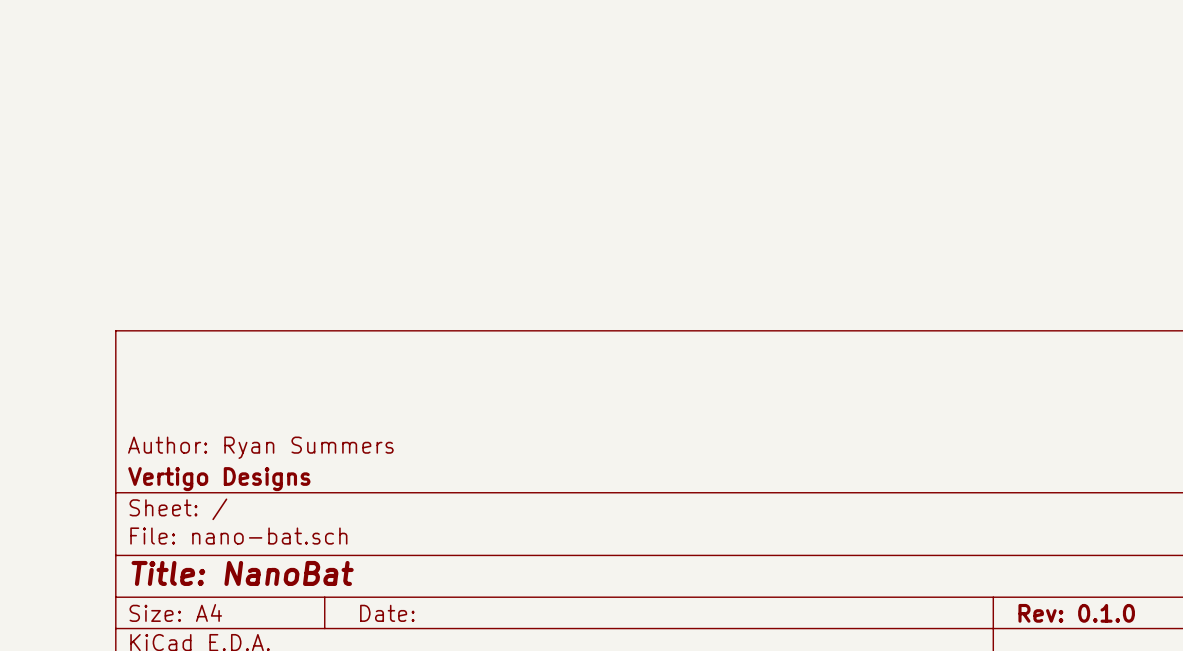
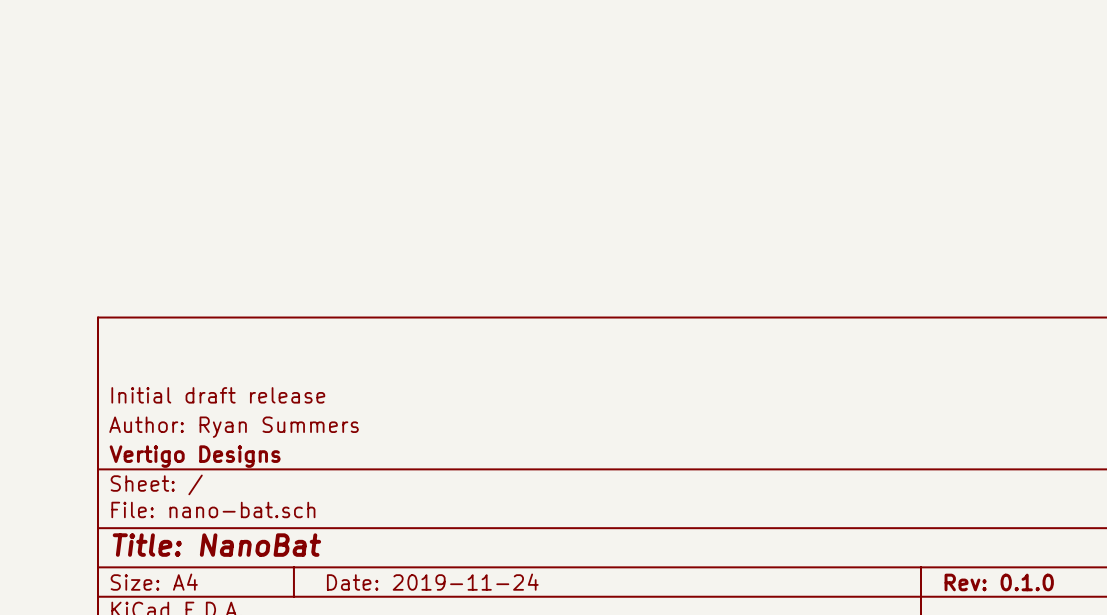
title block: none -> Initial draft release (218, 395)
title block: Date: (387, 613) -> Date: 2019-11-24 (432, 582)

